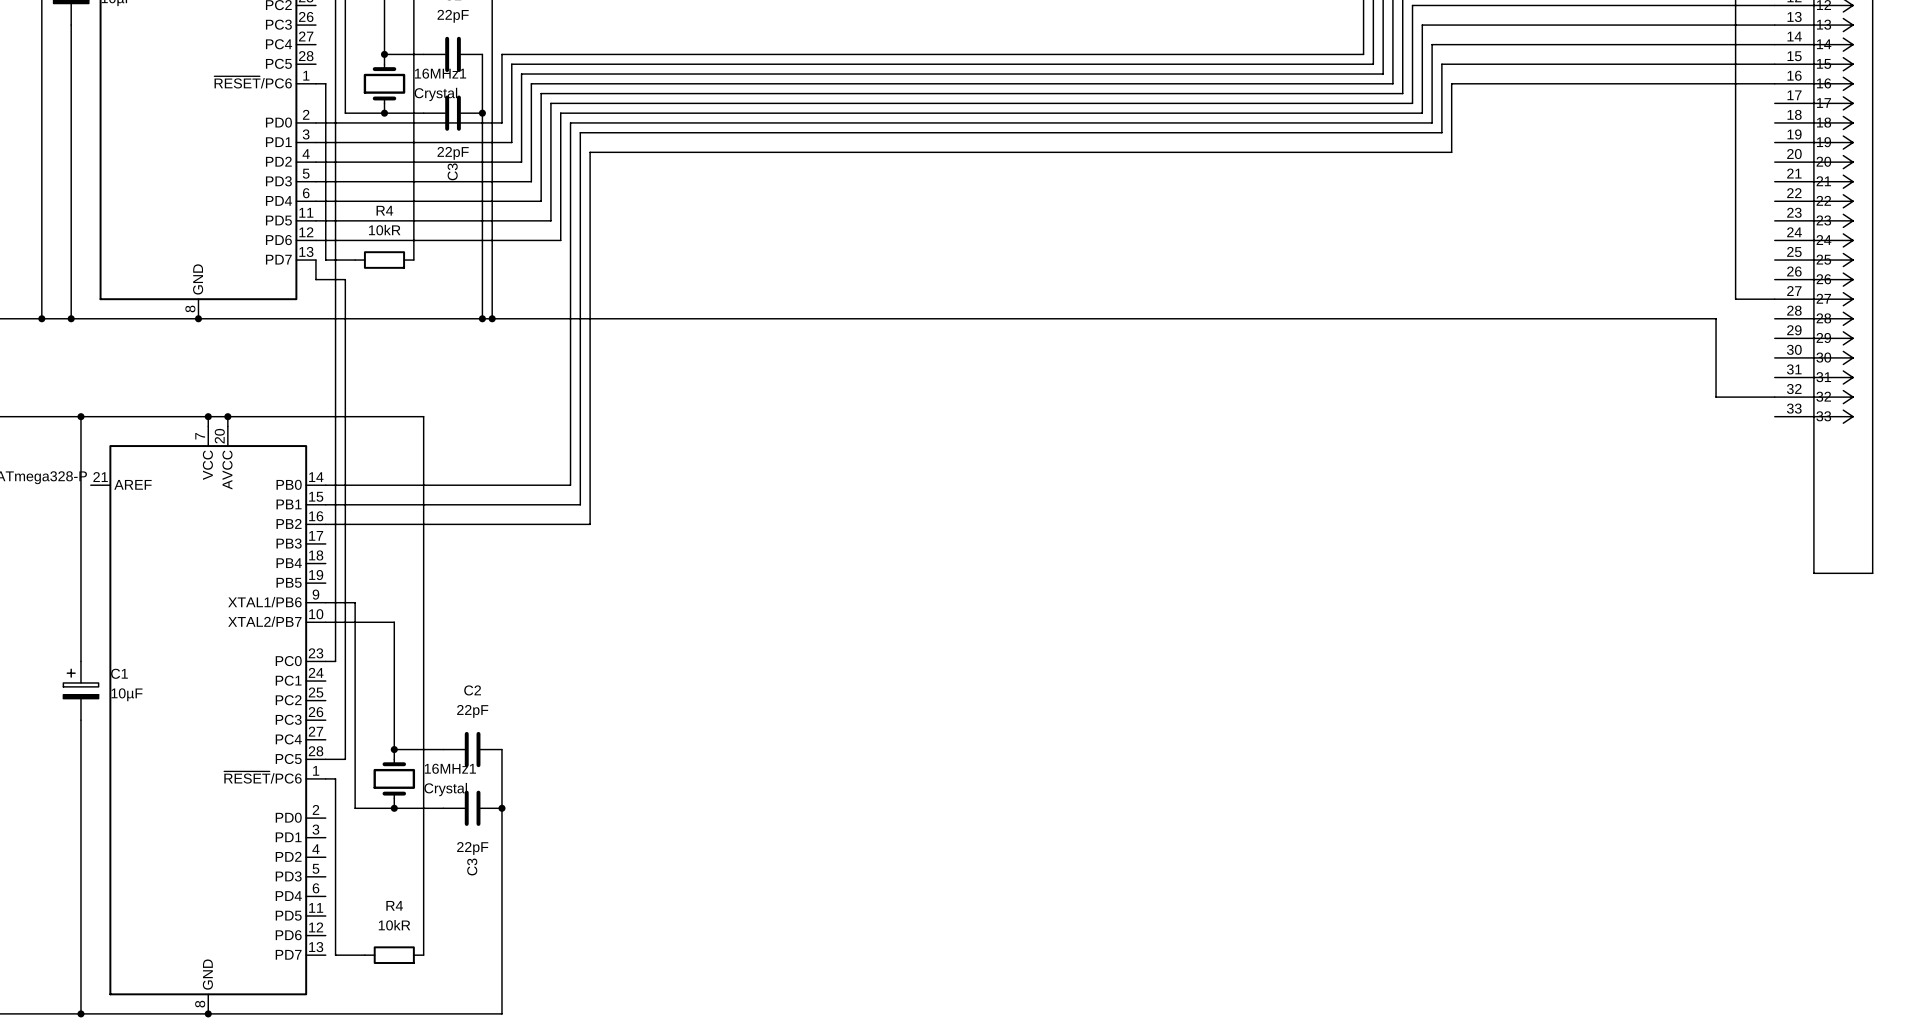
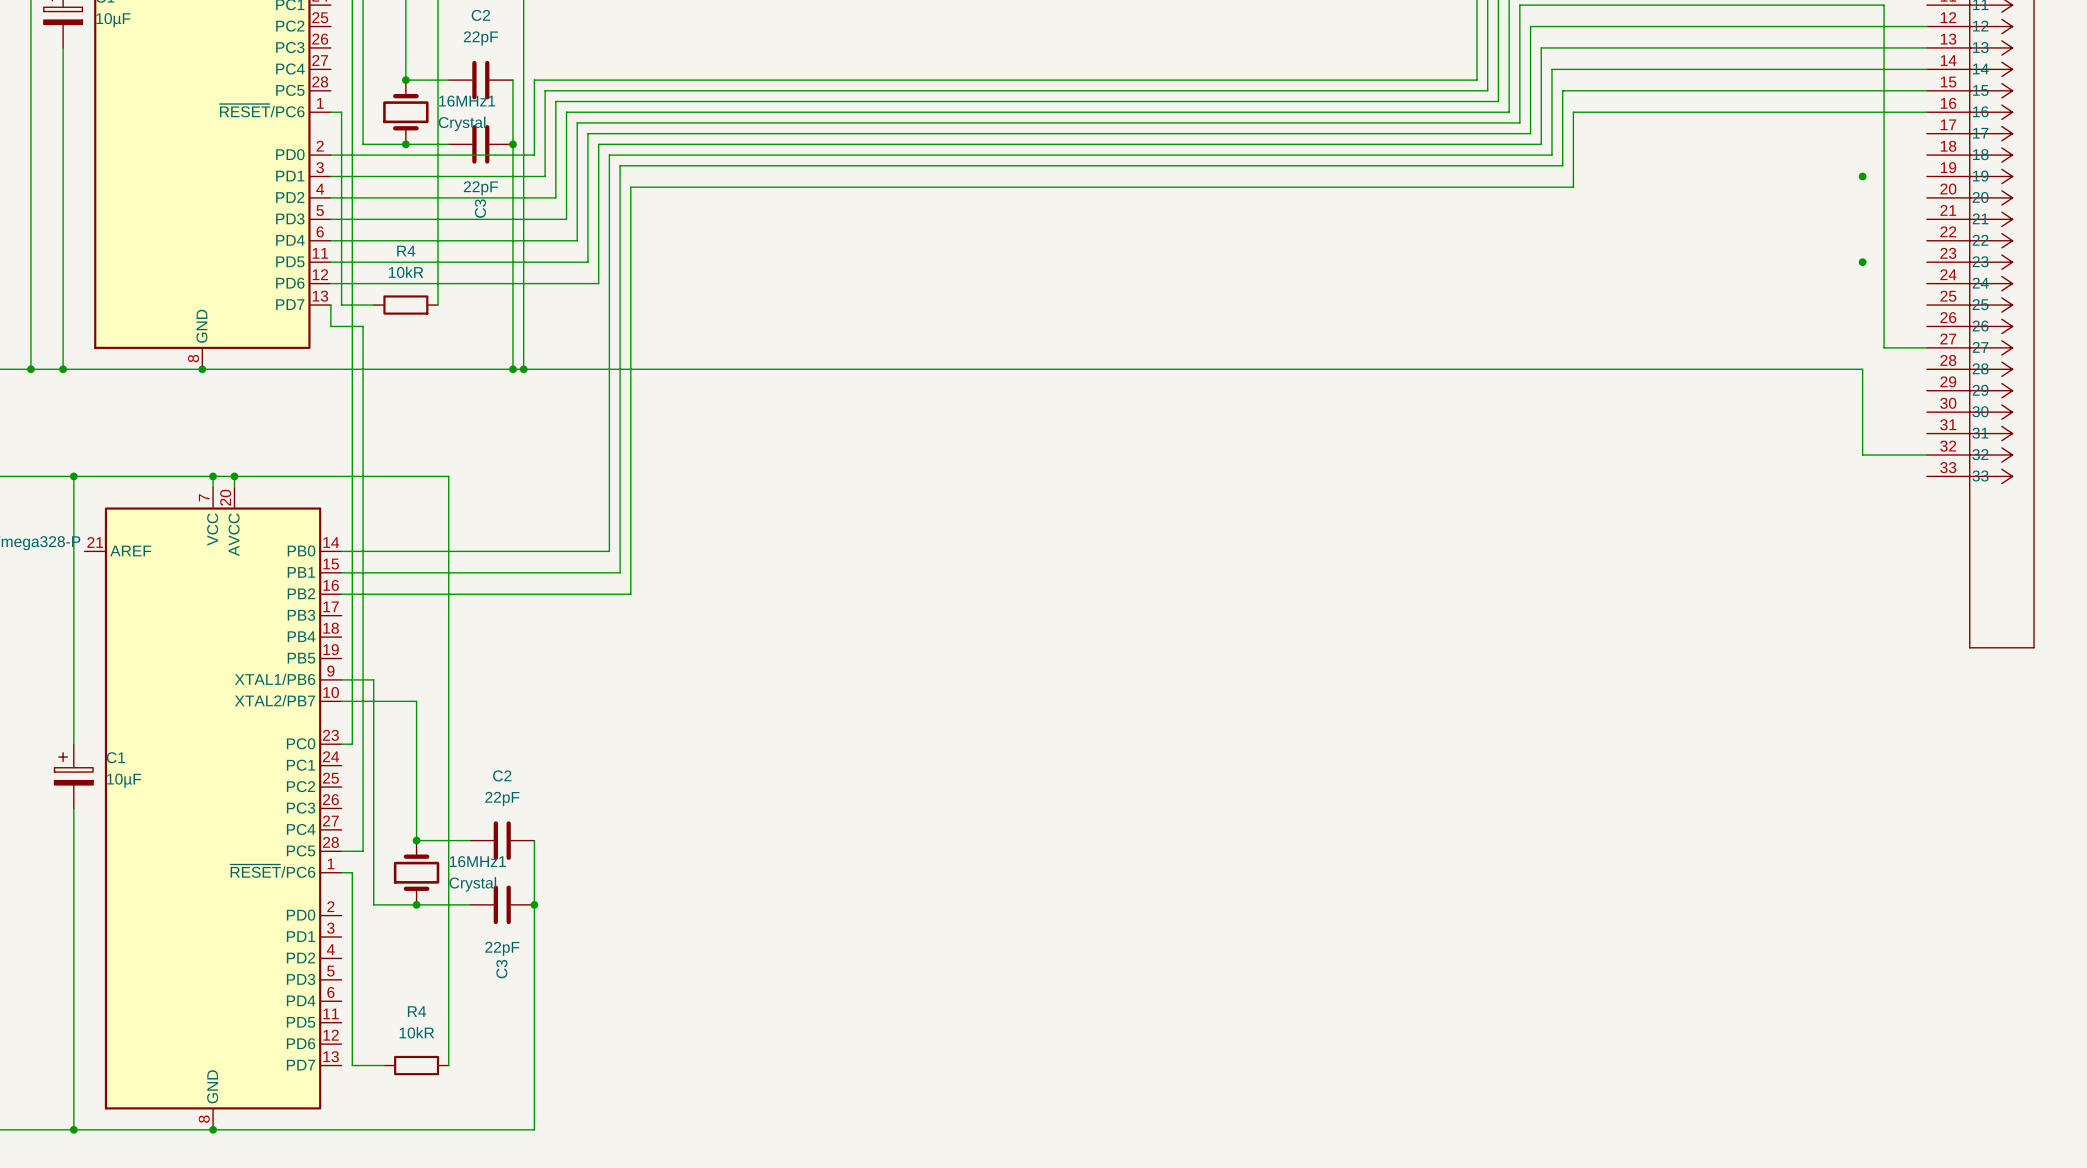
junction: none -> (1862, 176)
junction: none -> (1862, 262)

